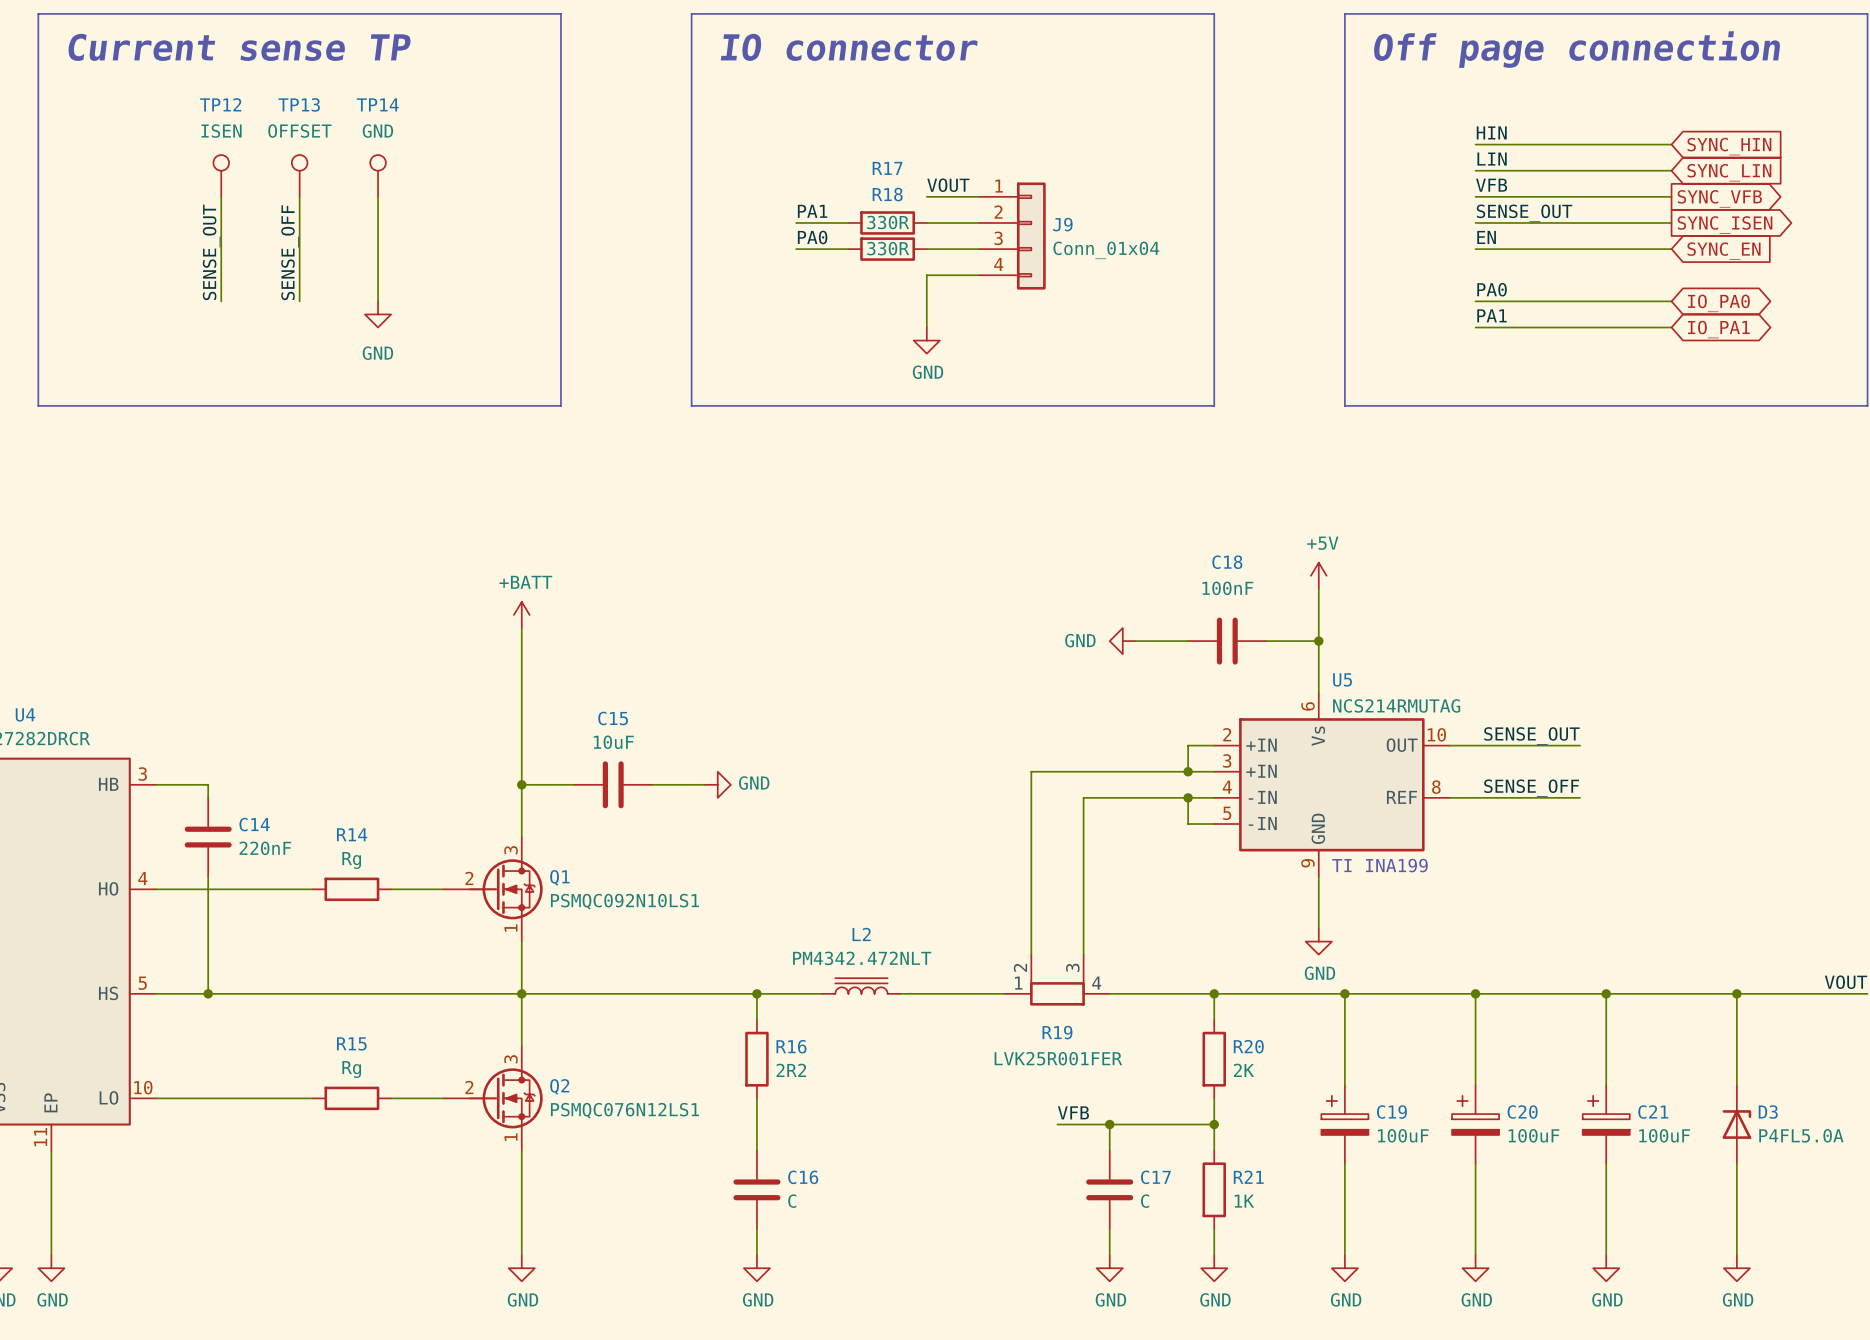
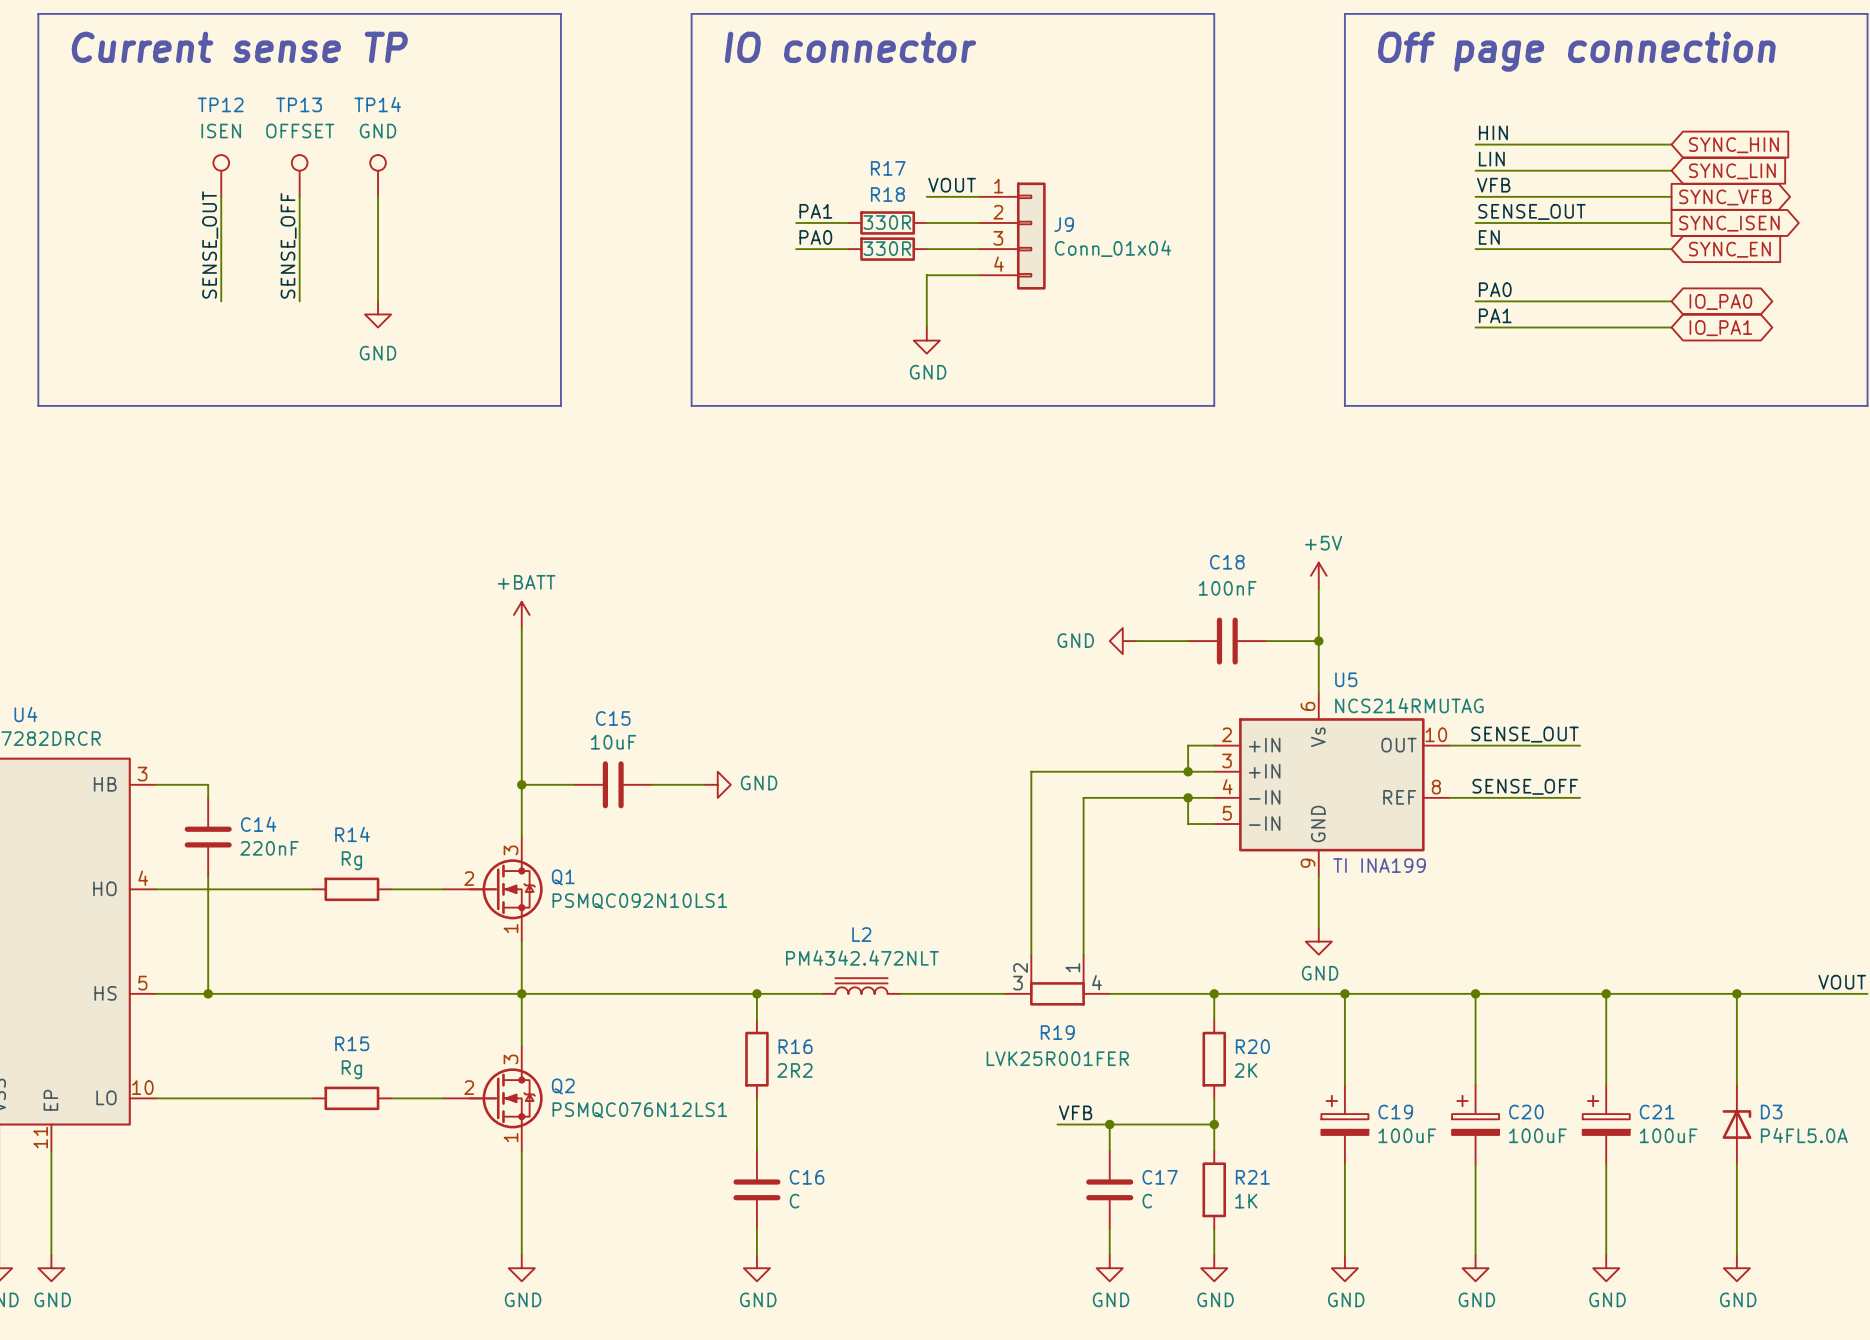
R19 pin name: 3 (1072, 967) -> 1 (1072, 967)
R19 pin name: 1 (1018, 983) -> 3 (1017, 983)

